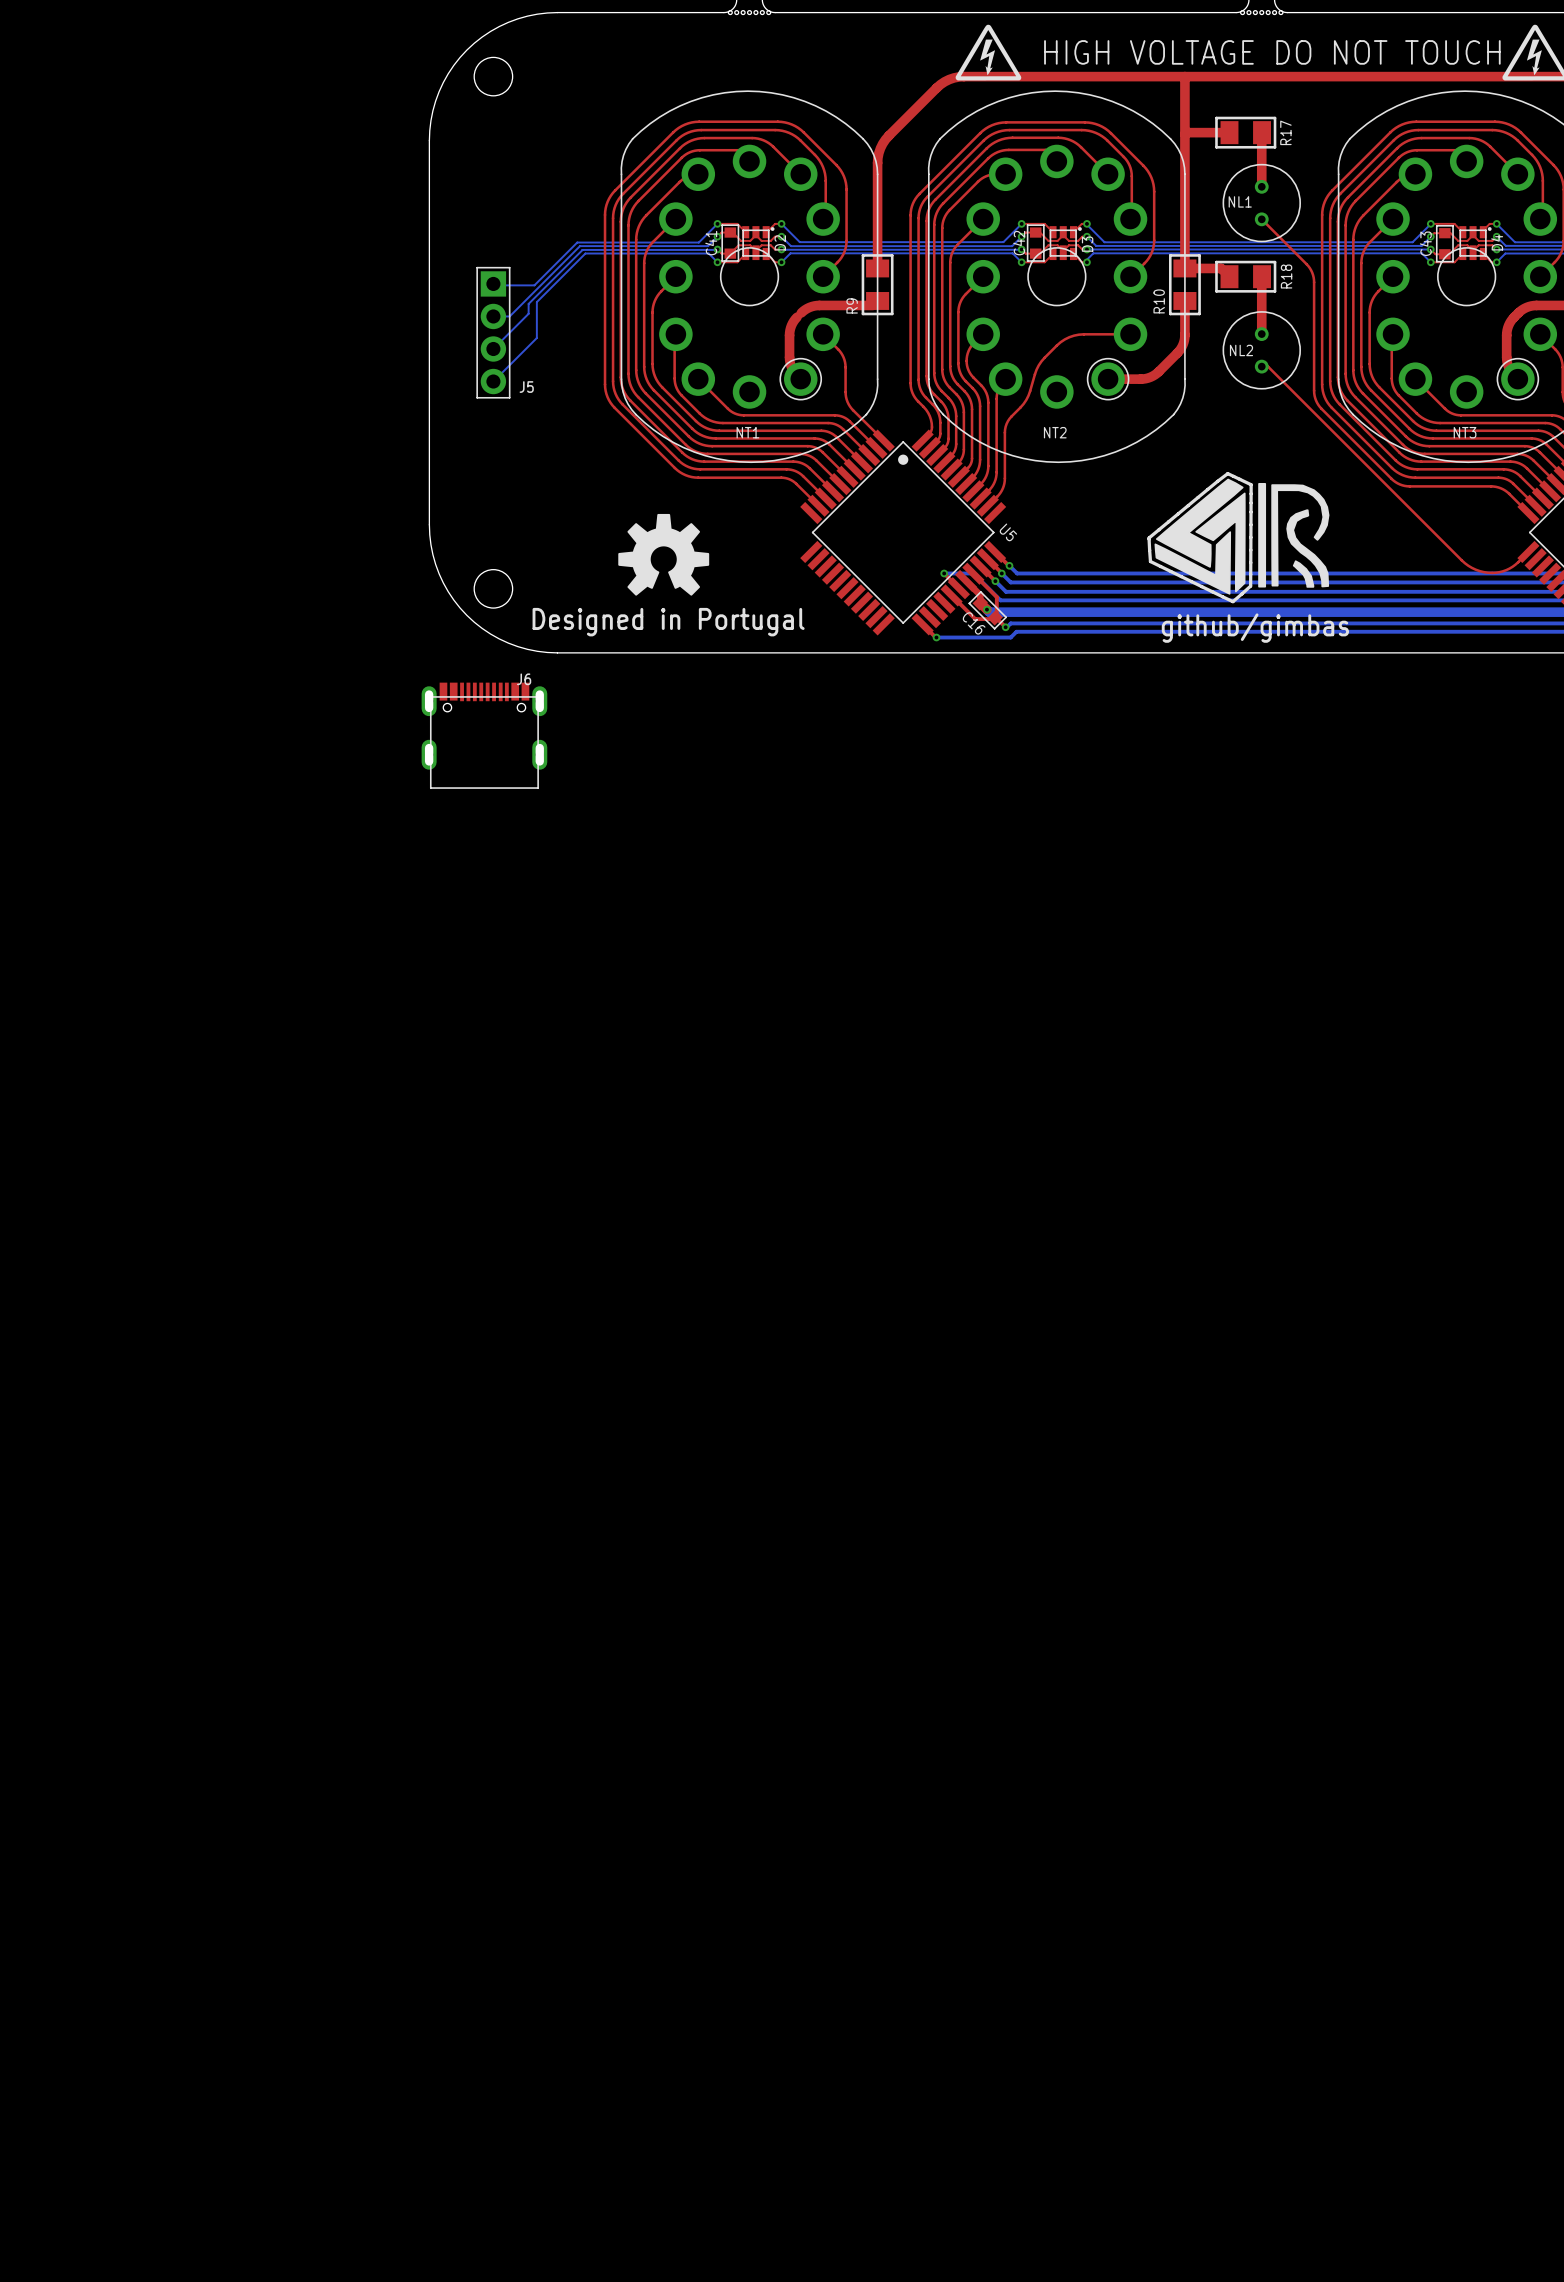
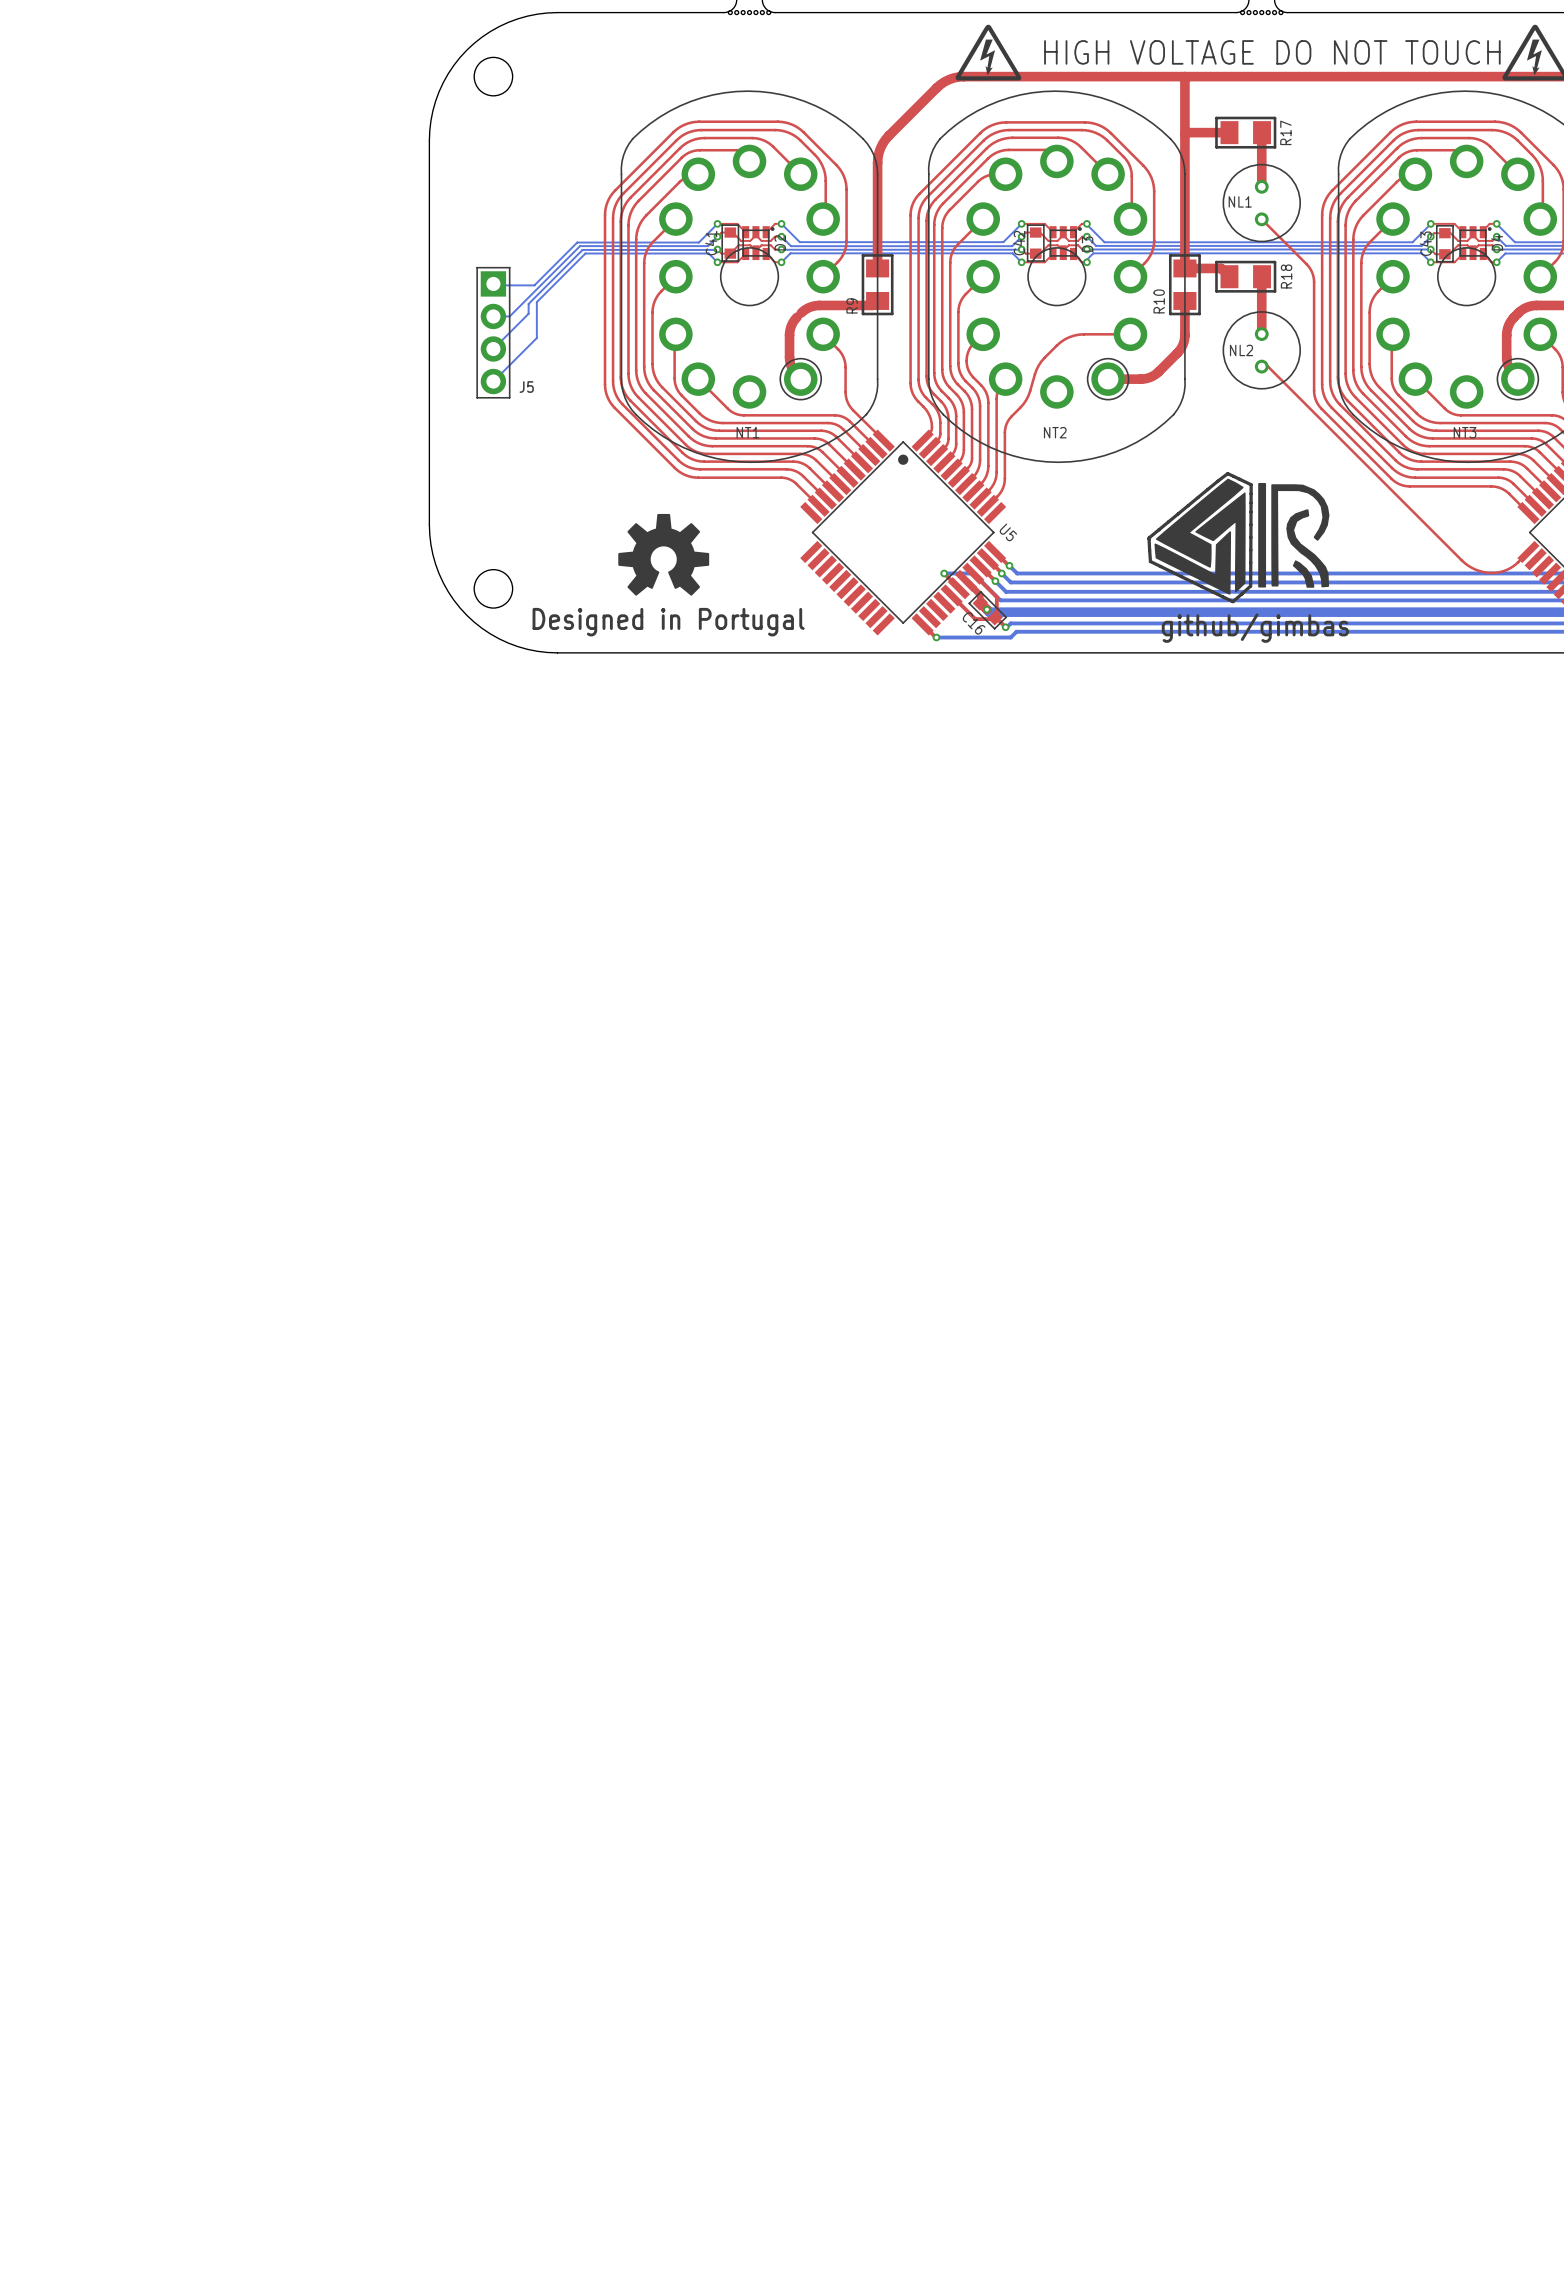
J6: (484, 735) -> none

